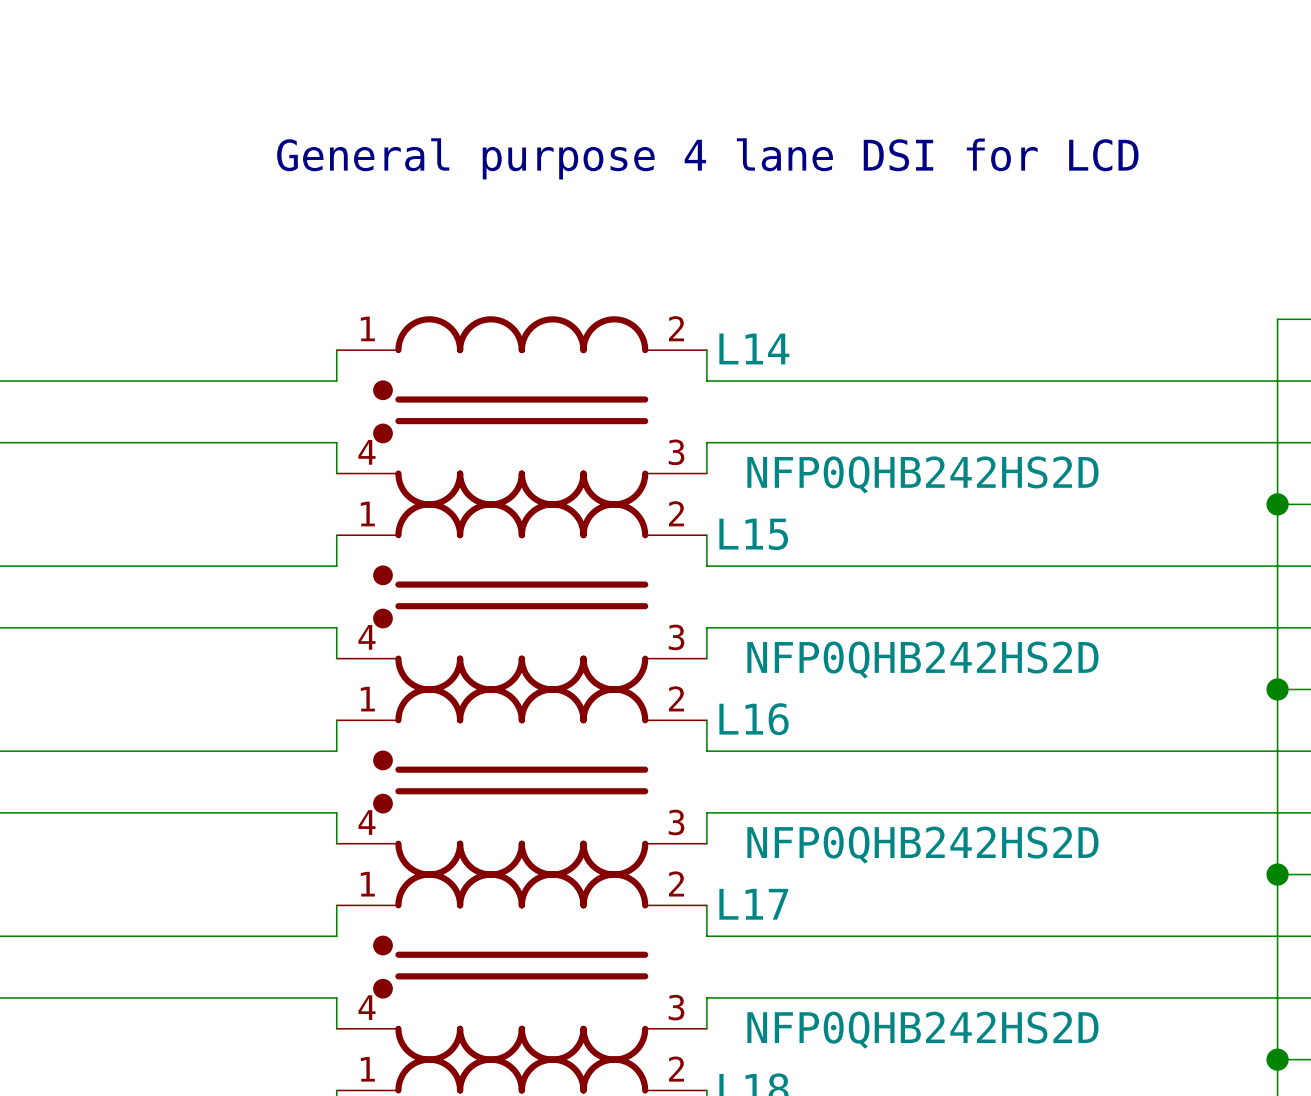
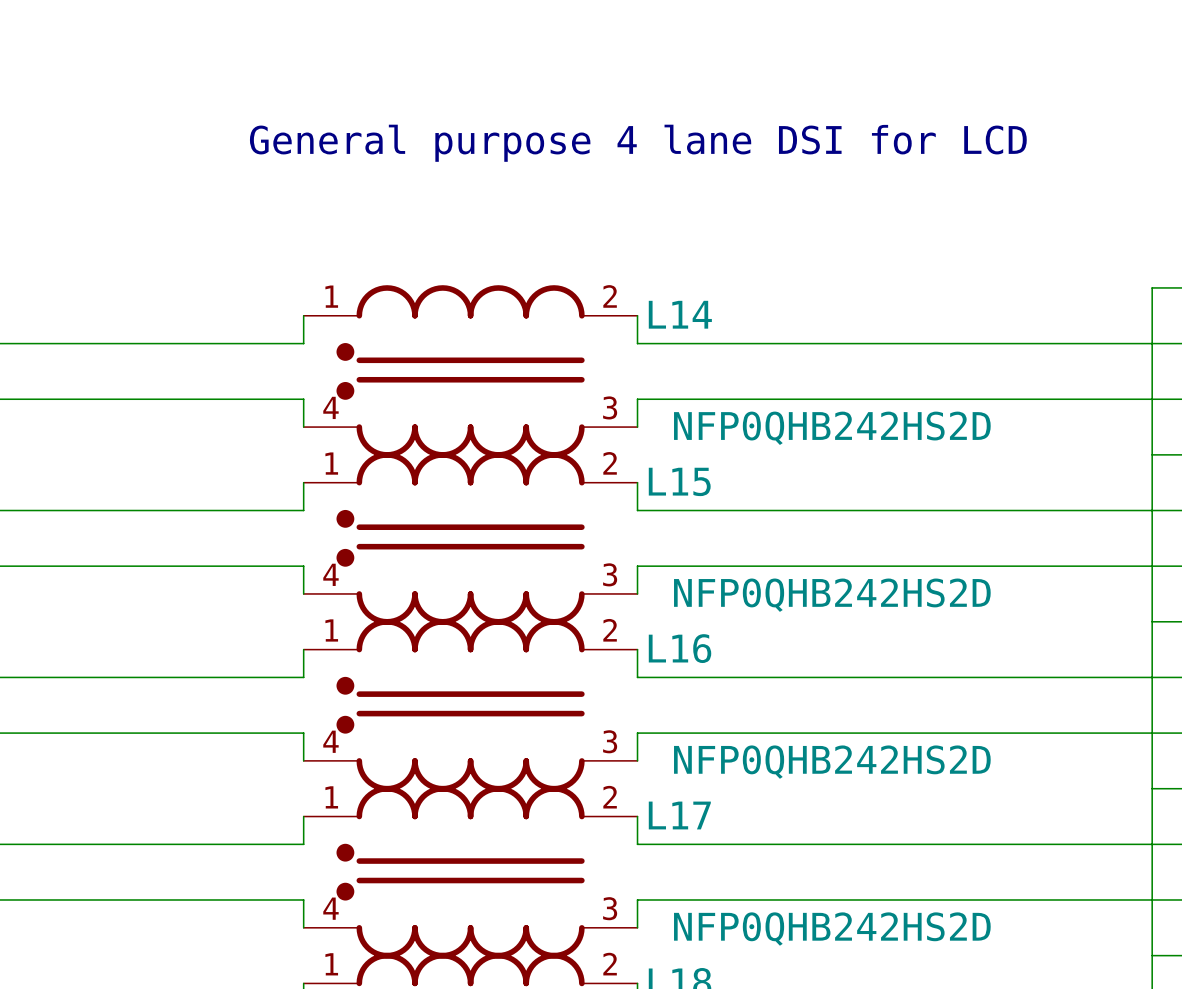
junction: (1277, 504) -> none
junction: (1277, 689) -> none
junction: (1277, 874) -> none
junction: (1277, 1059) -> none

